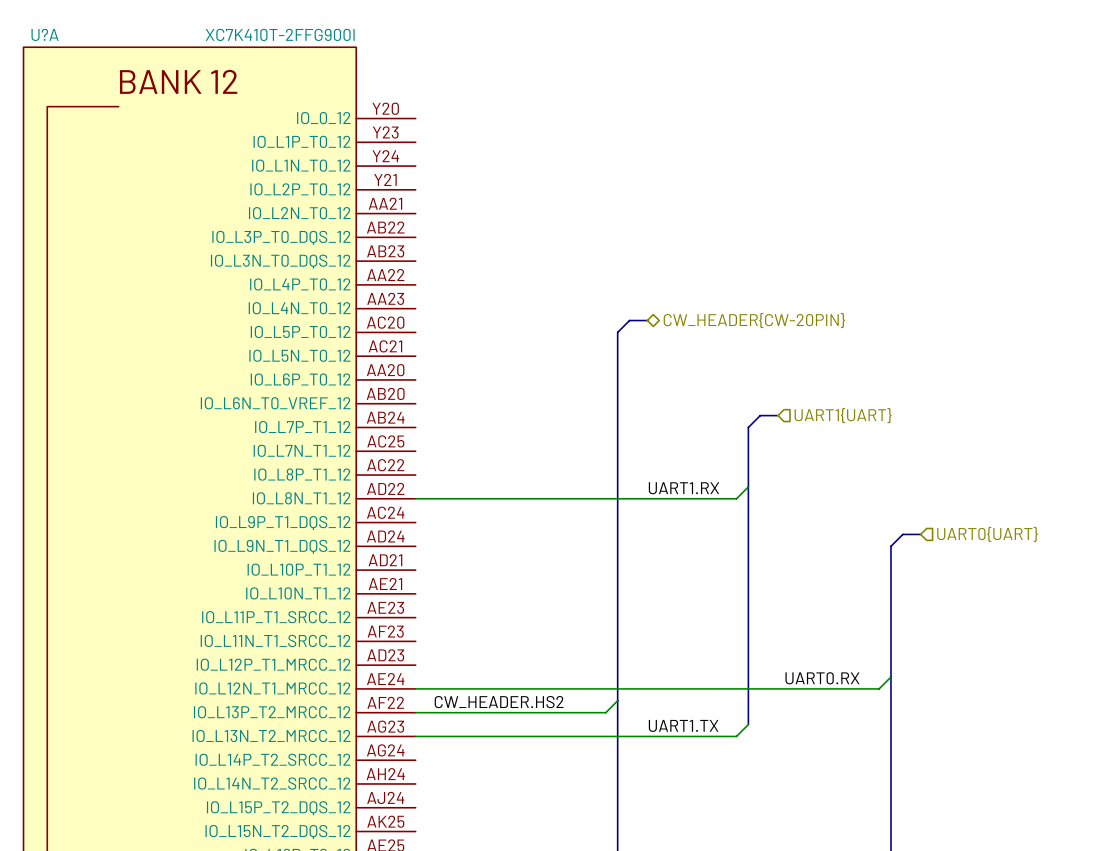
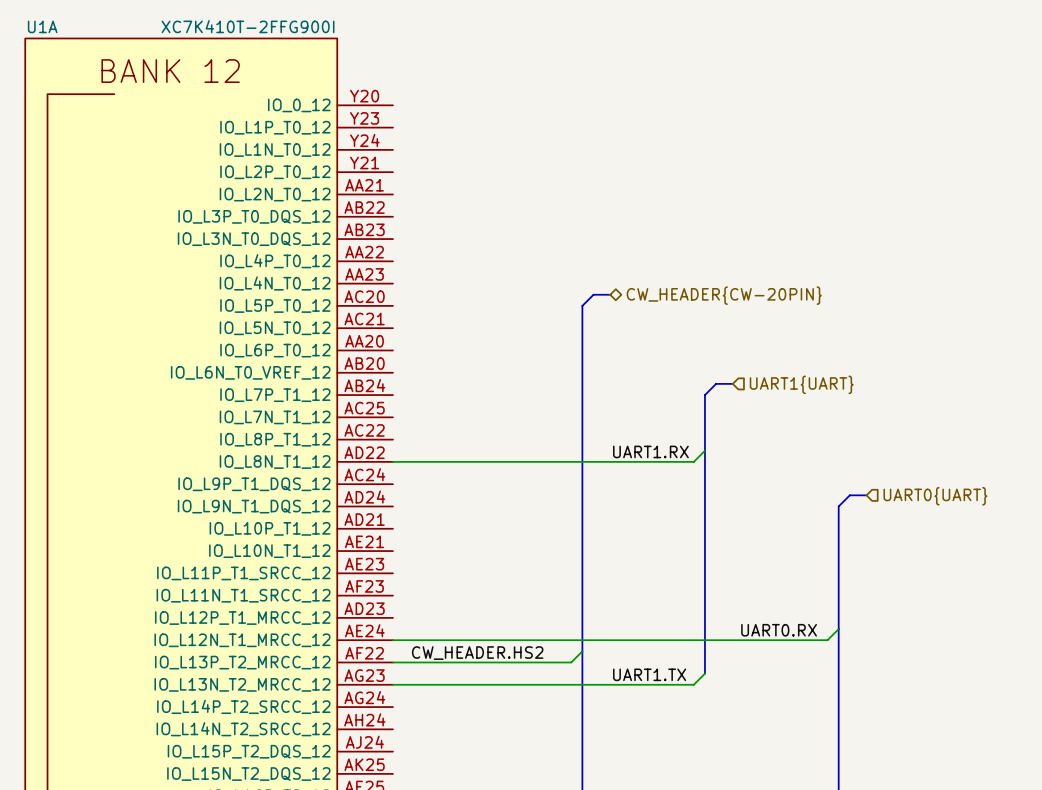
U?A name: U?A (45, 34) -> U1A (42, 26)

